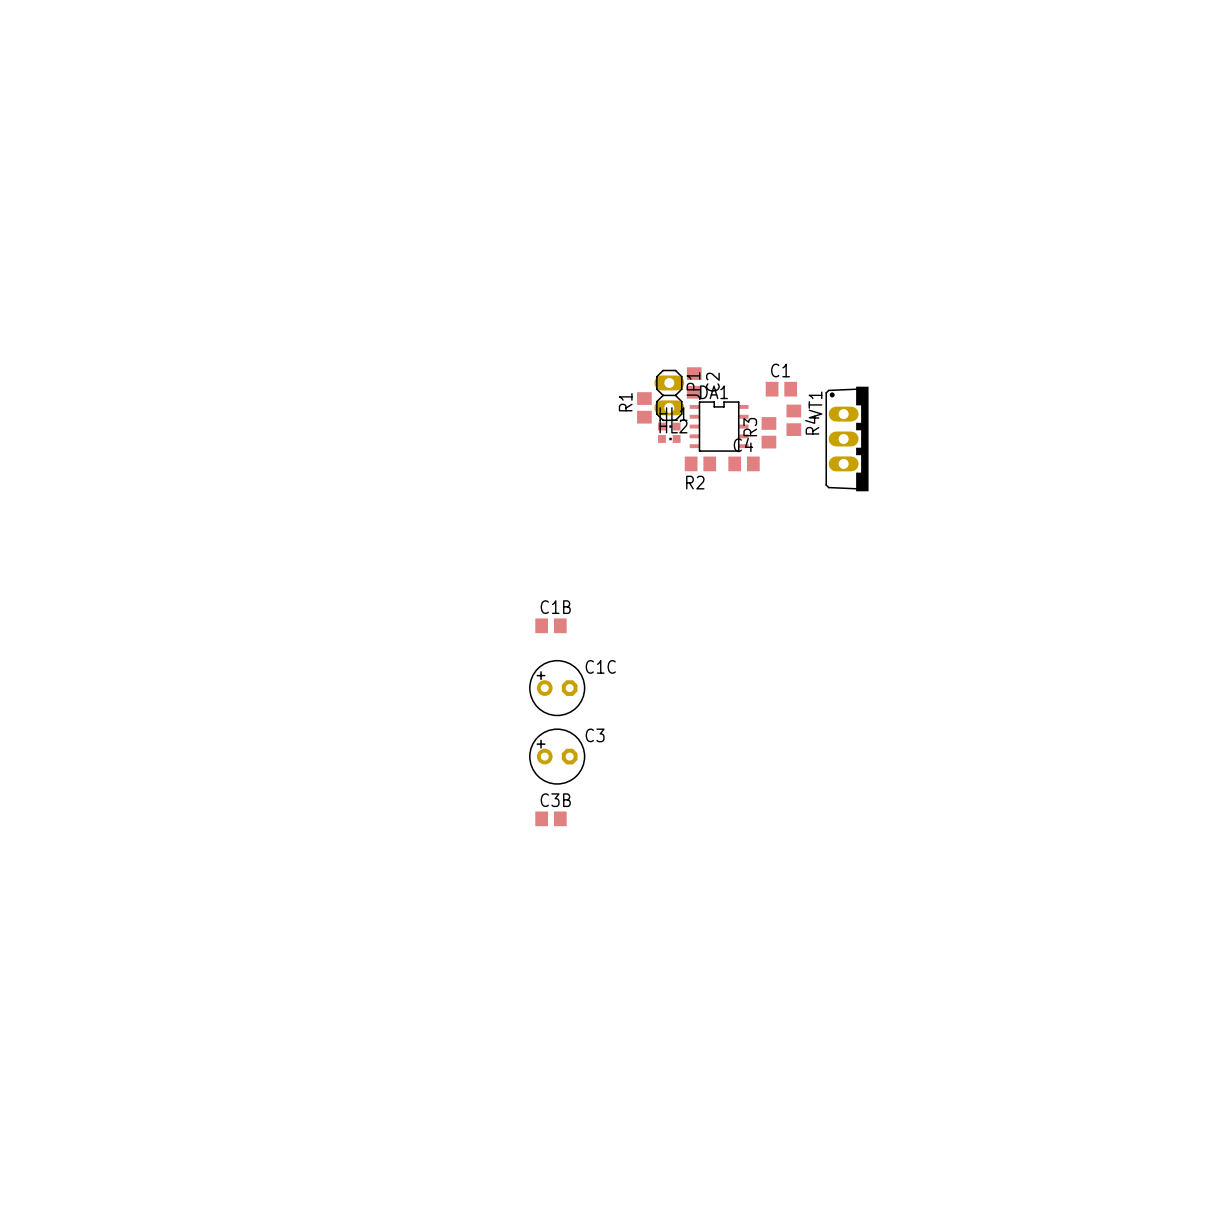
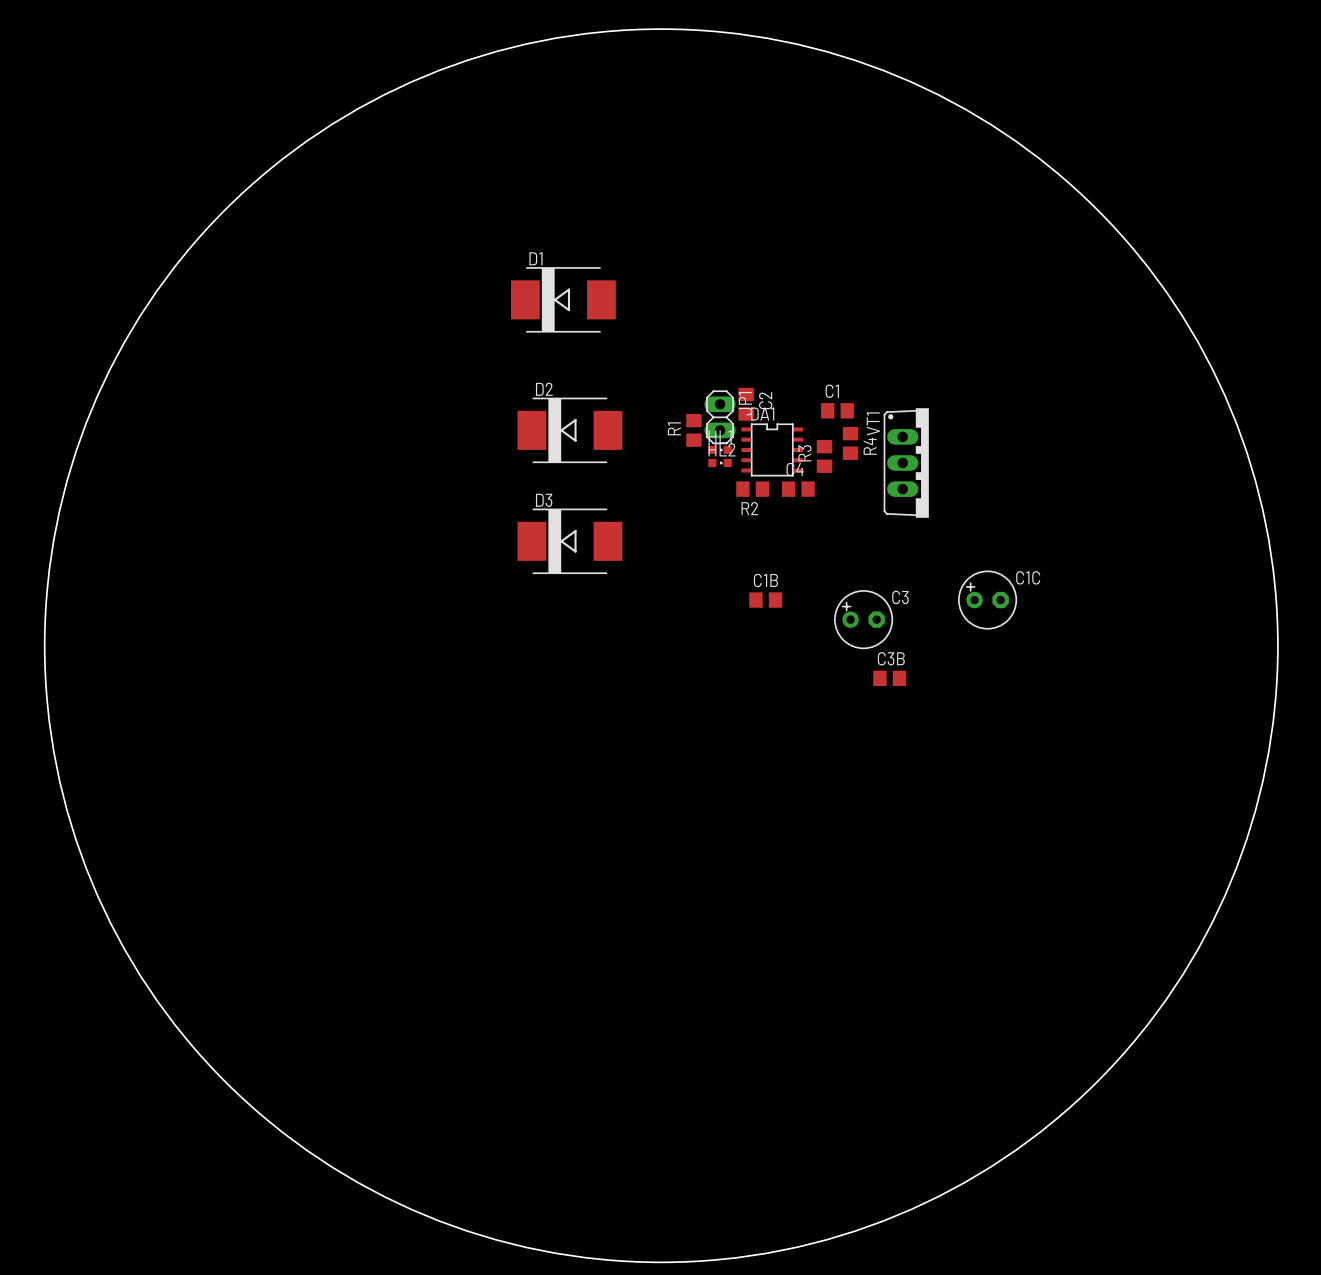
drawing: none -> [44, 28, 1279, 1263]
D1: none -> (563, 299)
D2: none -> (569, 430)
D3: none -> (569, 541)
C1B position: (550, 625) -> (765, 600)
C1C position: (557, 688) -> (987, 600)
C3 position: (557, 756) -> (863, 619)
C3B position: (550, 818) -> (889, 678)

